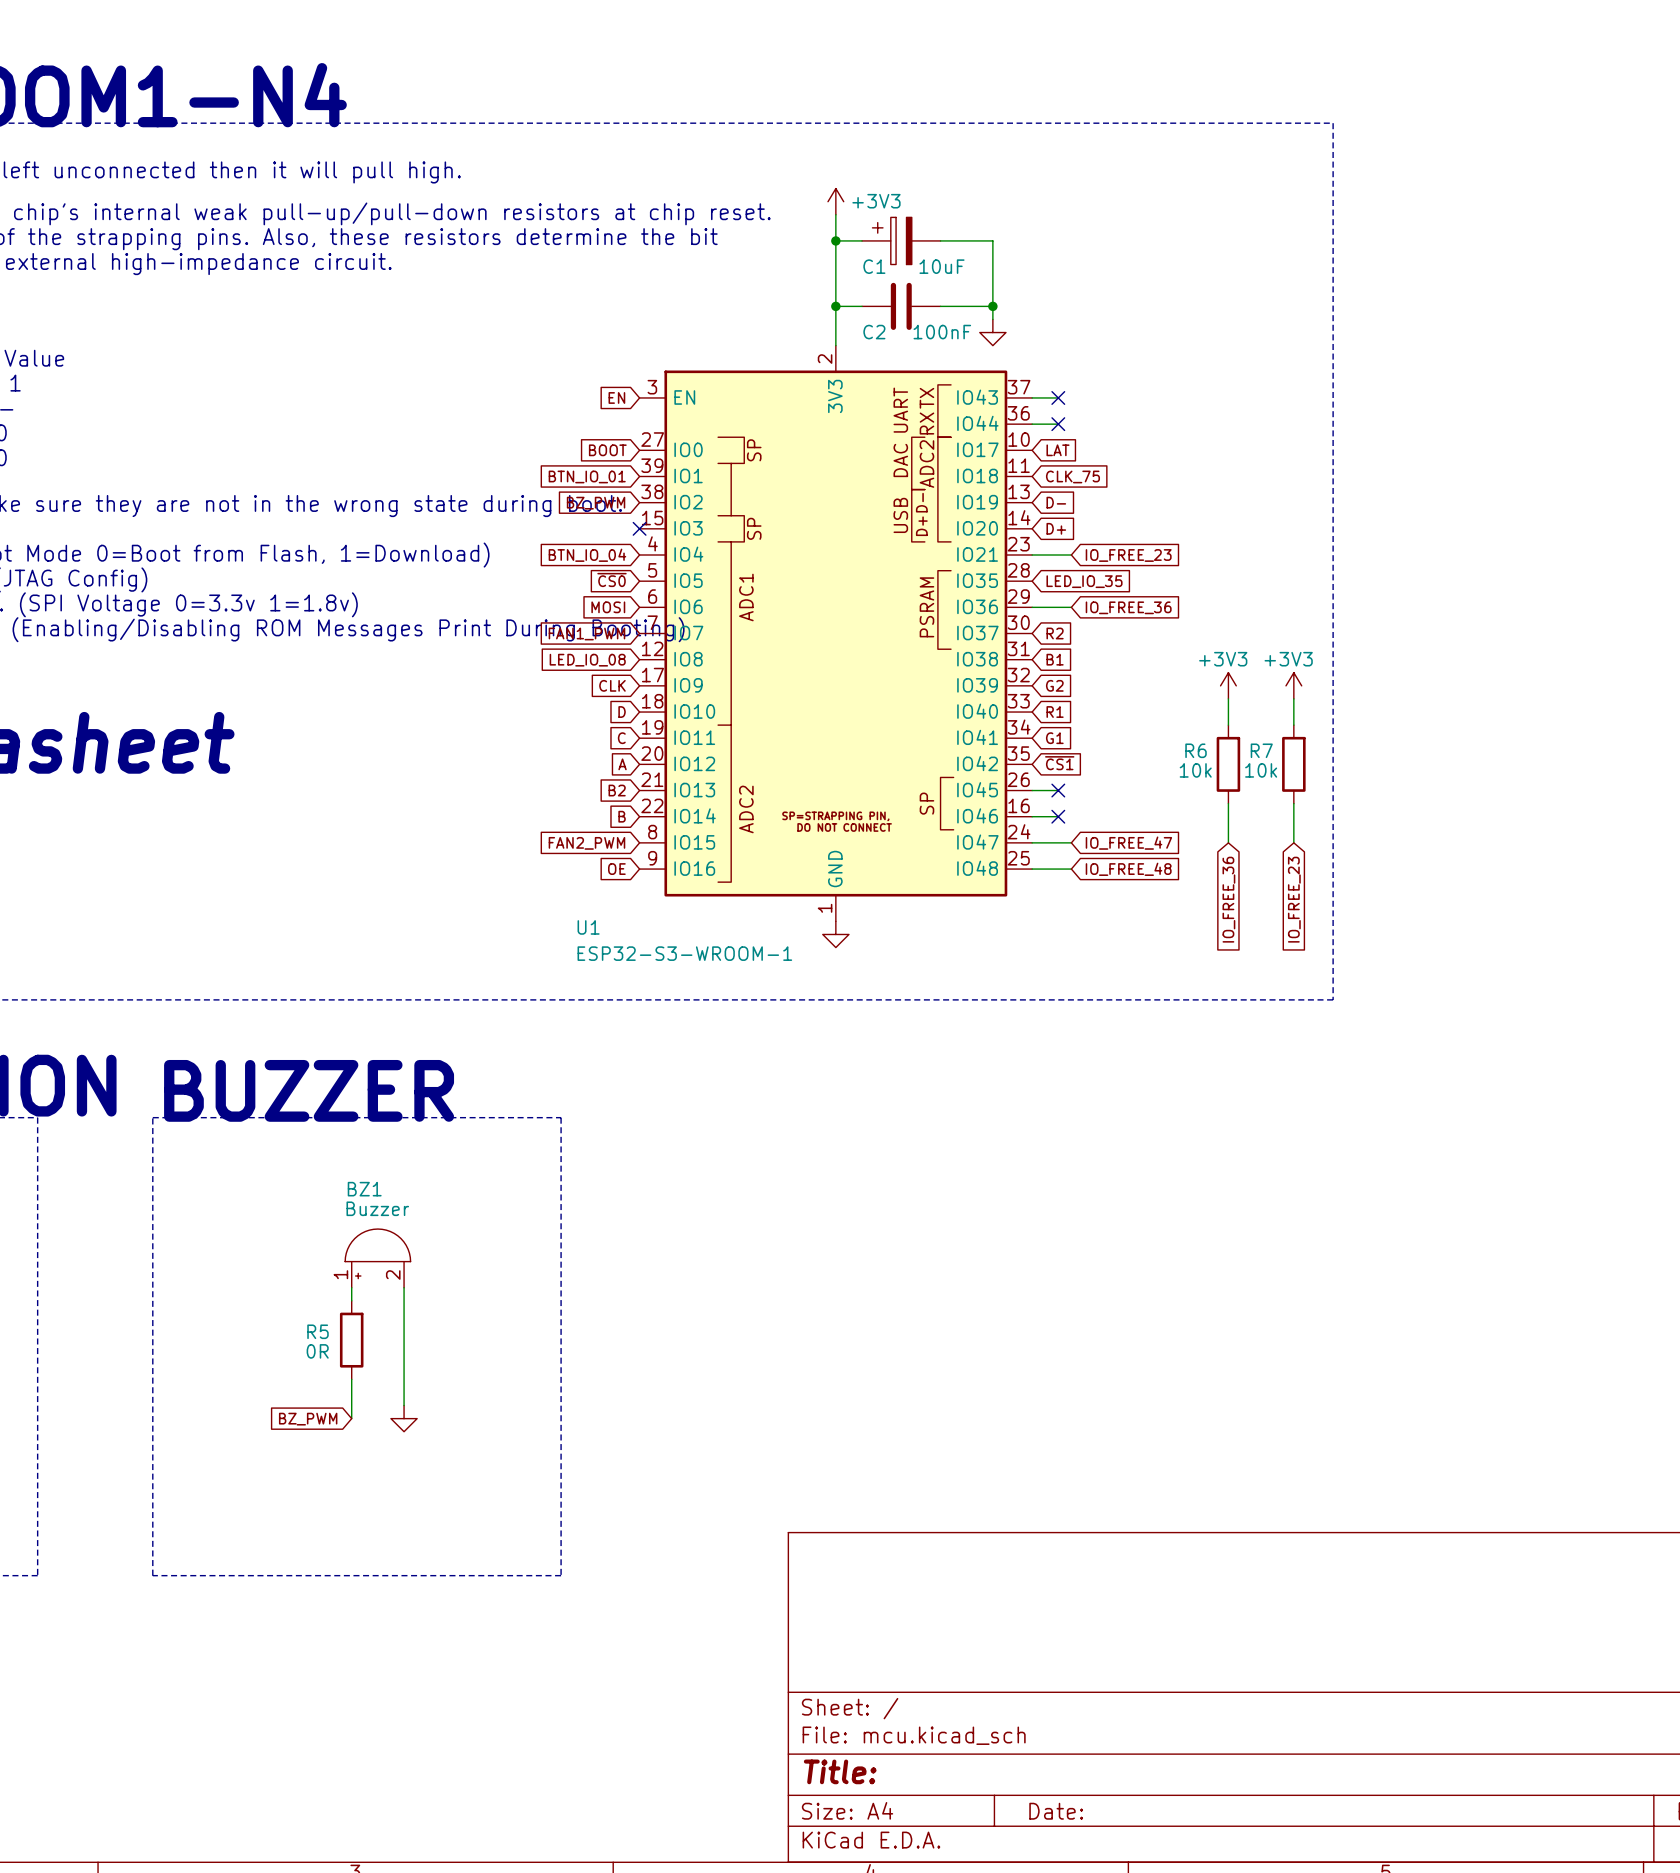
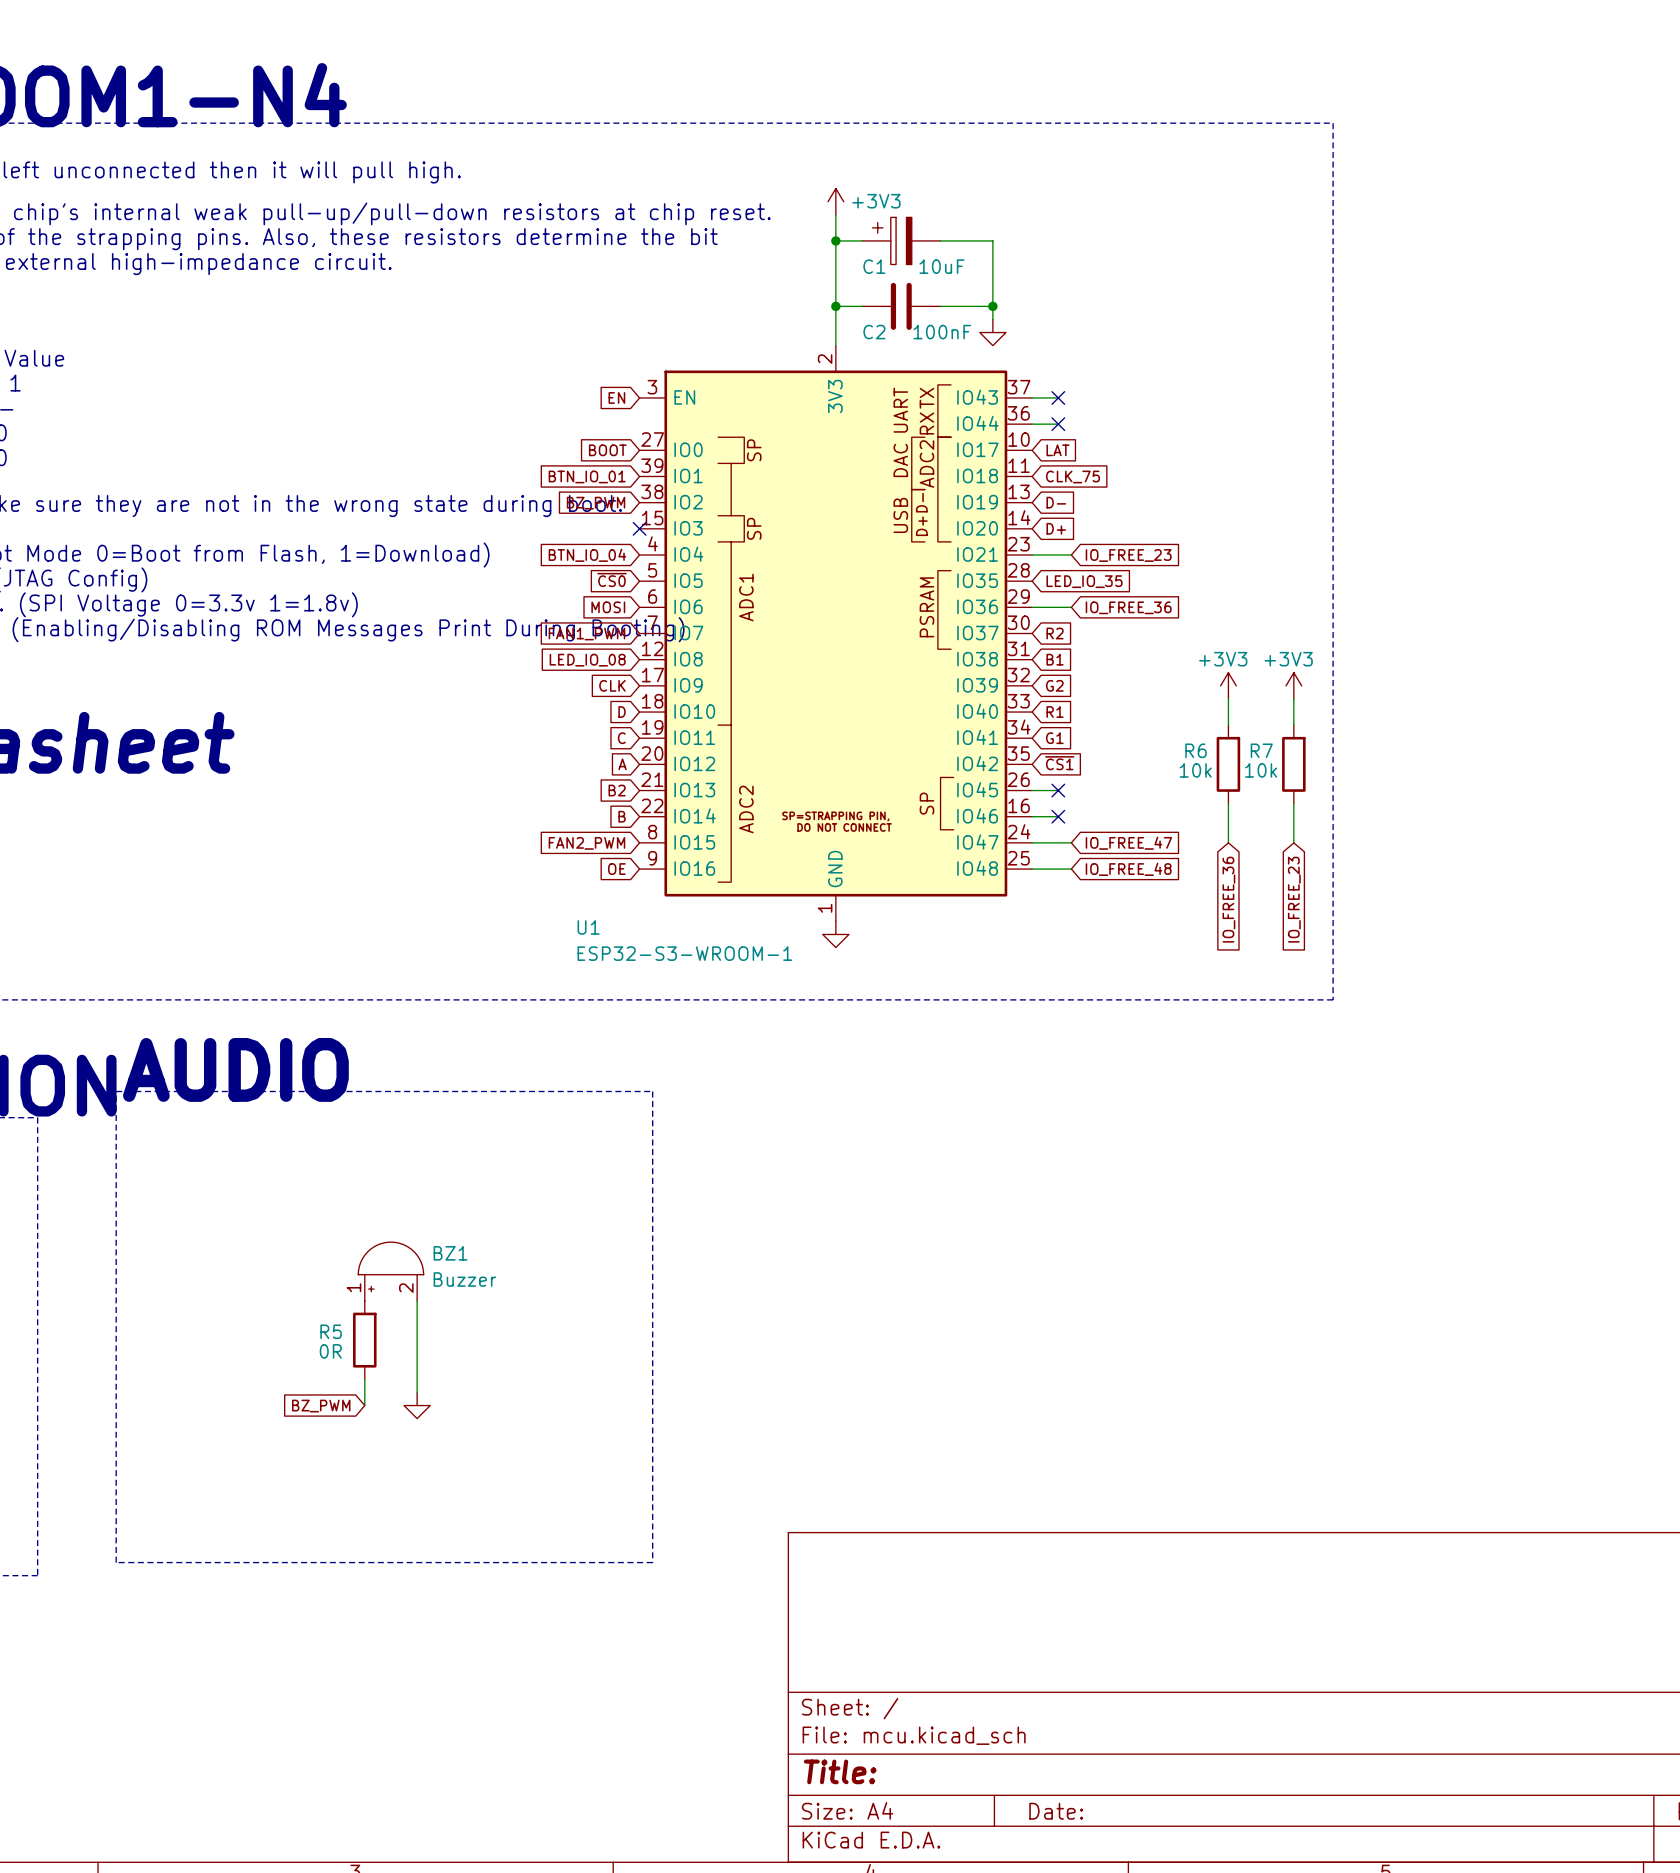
text: none -> AUDIO (235, 1069)
text: BUZZER (309, 1090) -> none
line: (152, 1117) (561, 1117) (561, 1575) (152, 1575) (152, 1117) -> (116, 1091) (116, 1562) (652, 1562) (652, 1091) (116, 1091)
BZ1 name position: BZ1 (364, 1189) -> BZ1 (450, 1253)
BZ1 value position: Buzzer (377, 1208) -> Buzzer (464, 1279)
BZ1 position: (377, 1258) -> (390, 1271)
wire: (351, 1287) (351, 1300) -> none
wire: (404, 1287) (404, 1405) -> none
wire: none -> (417, 1300) (417, 1392)
R5 position: (351, 1340) -> (364, 1340)
wire: (351, 1379) (351, 1418) -> none
wire: none -> (364, 1379) (364, 1405)
power symbol position: (404, 1418) -> (417, 1405)
global label position: BZ_PWM (308, 1419) -> BZ_PWM (321, 1406)

